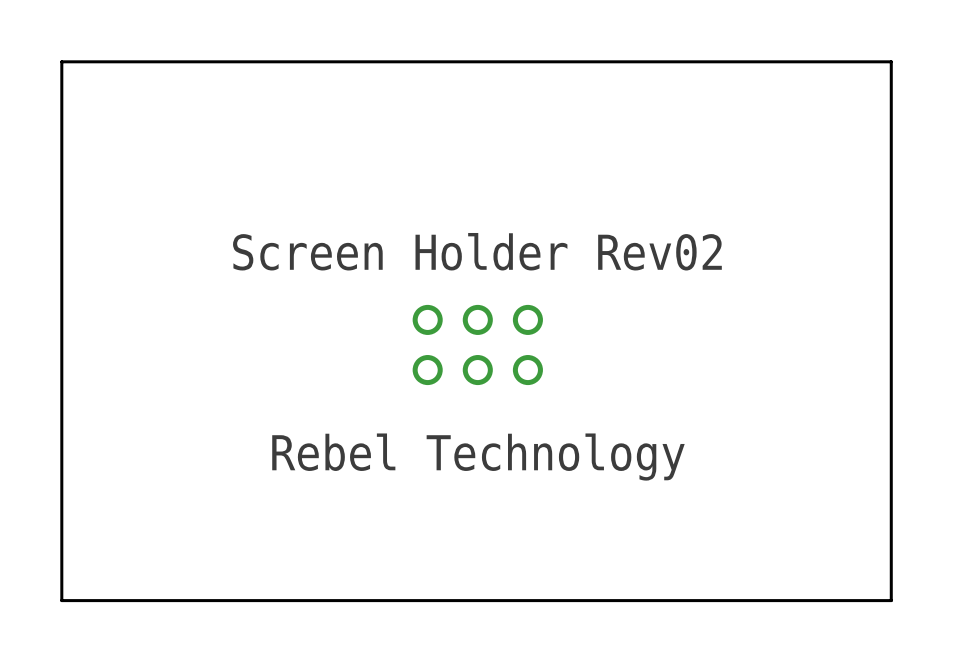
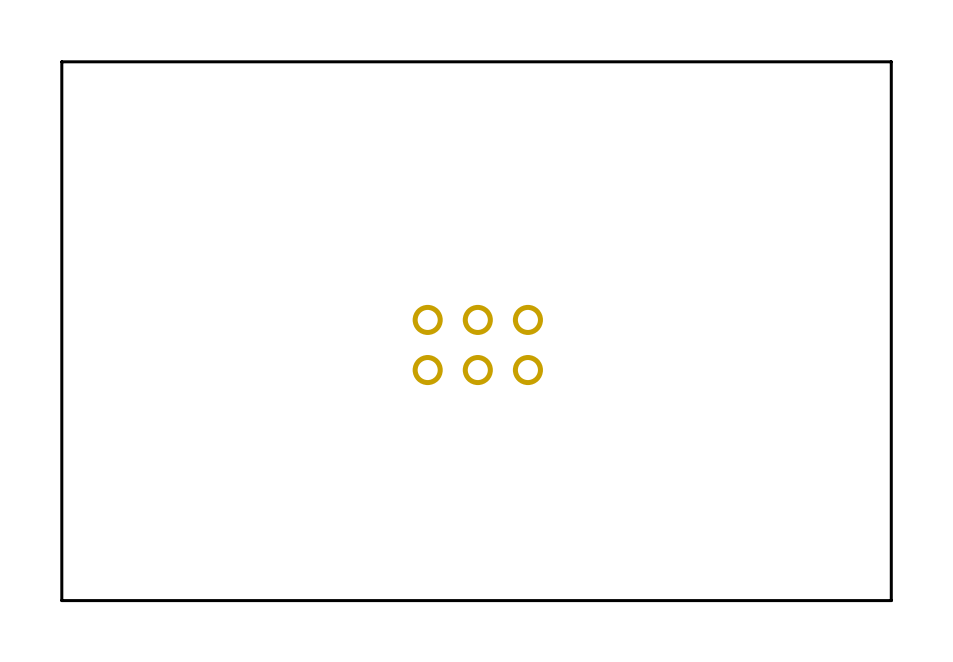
text: Screen Holder Rev02 (477, 251) -> none
text: Rebel Technology (478, 457) -> none

